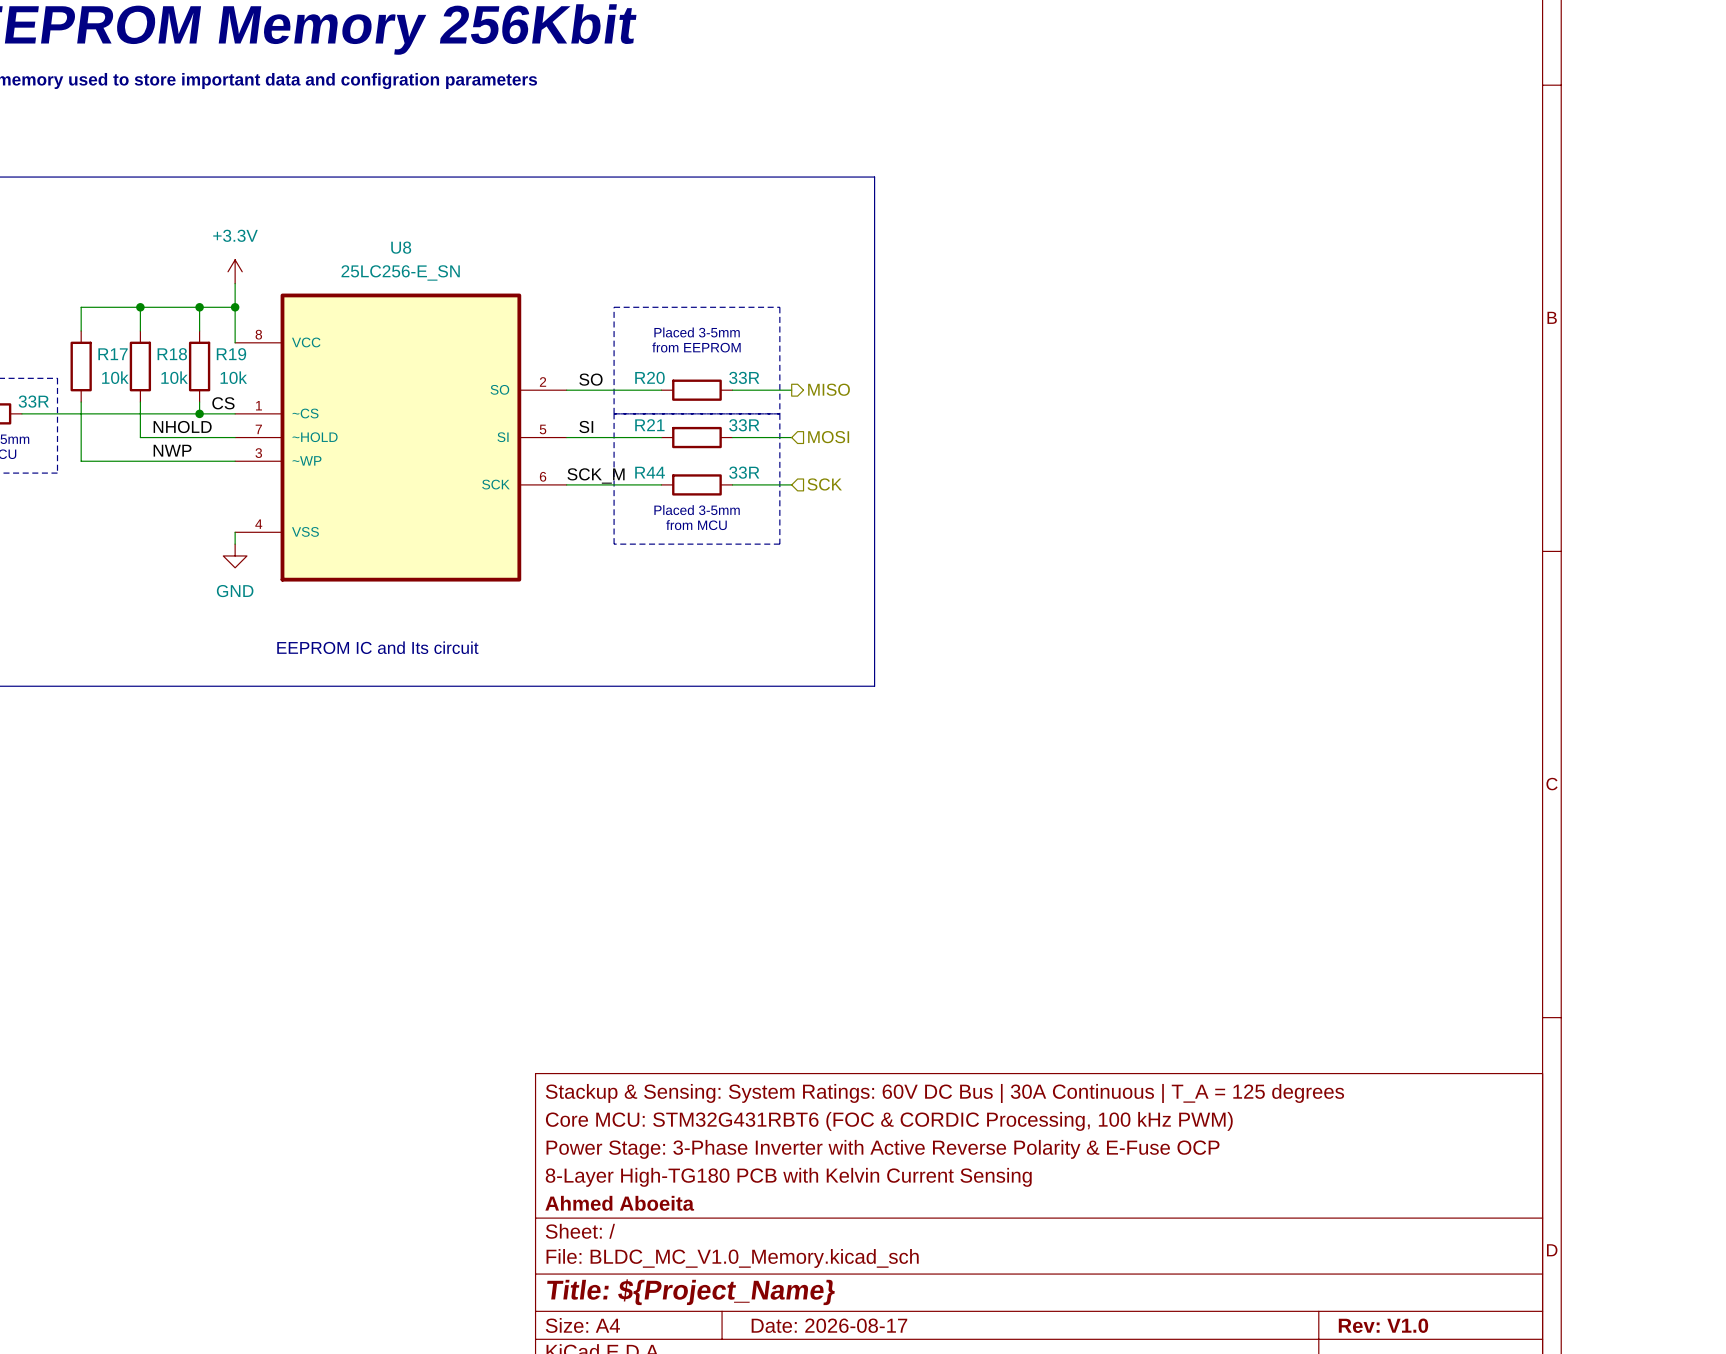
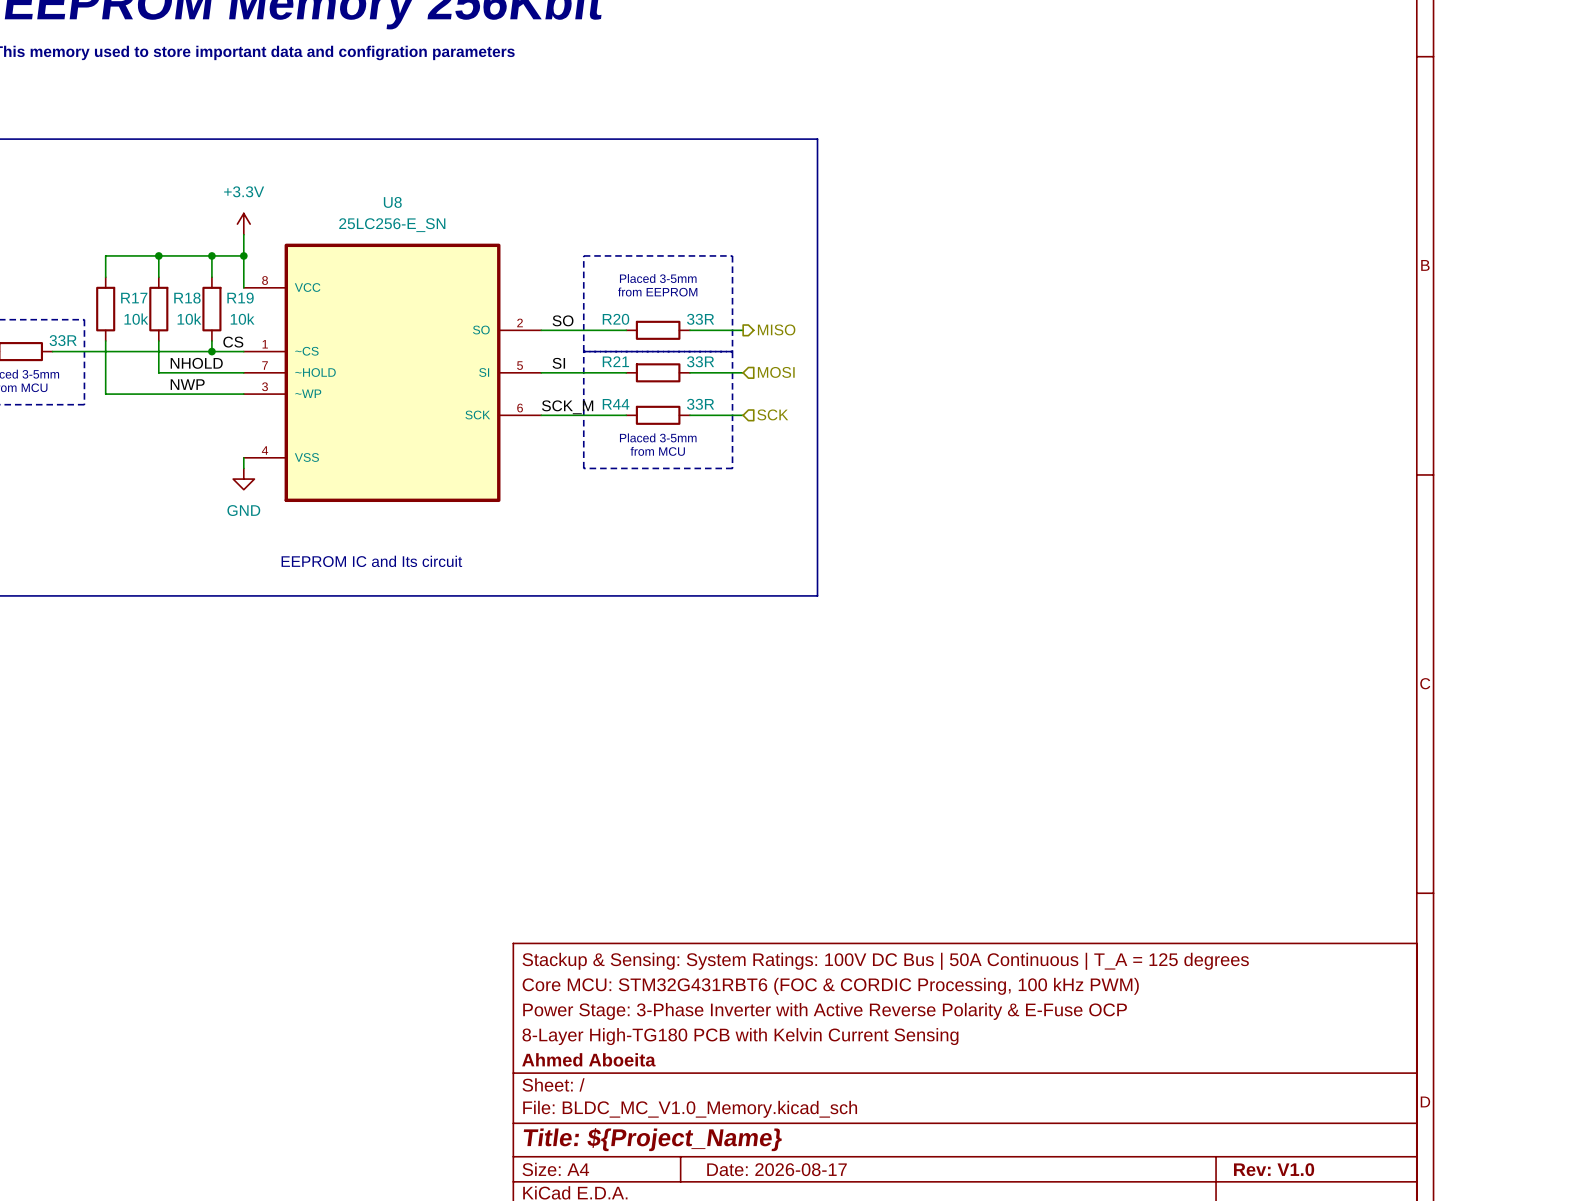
title block: Stackup & Sensing: System Ratings: 60V DC Bus | 30A Continuous | T_A = 125 degrees (944, 1093) -> Stackup & Sensing: System Ratings: 100V DC Bus | 50A Continuous | T_A = 125 degrees (885, 961)

